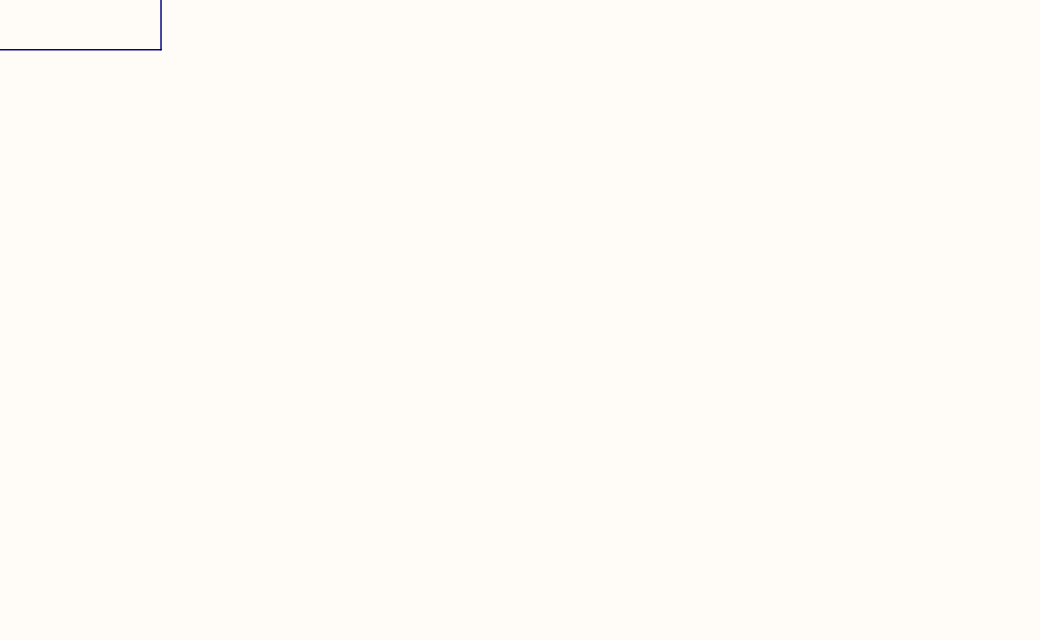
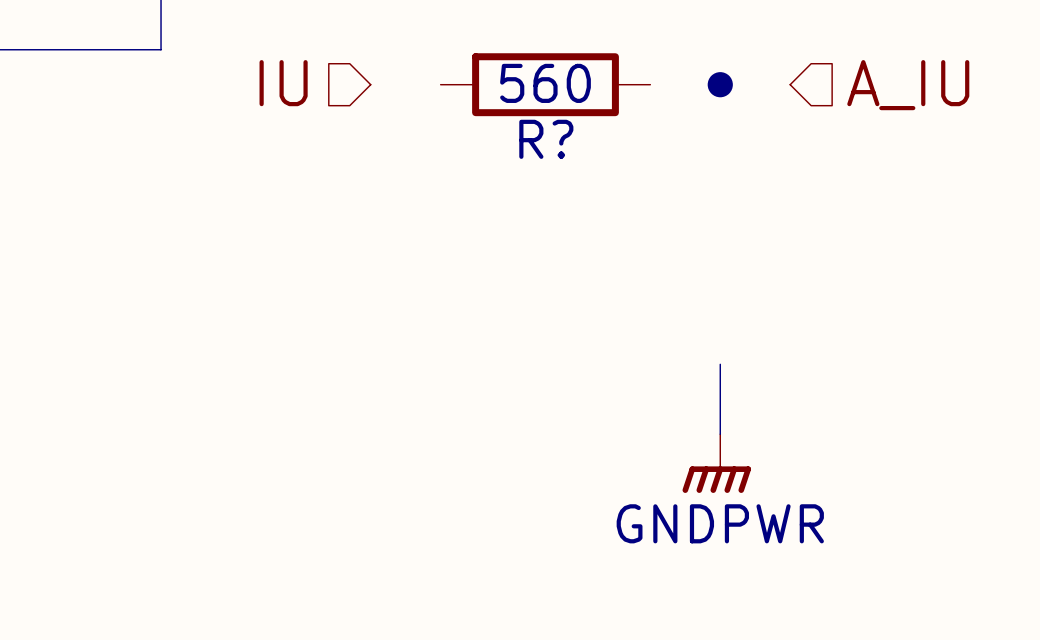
hierarchical label: none -> IU (283, 83)
R?: none -> 560 (545, 84)
junction: none -> (720, 84)
hierarchical label: none -> A_IU (908, 85)
wire: none -> (720, 364) (720, 434)
power symbol: none -> GNDPWR (716, 463)

